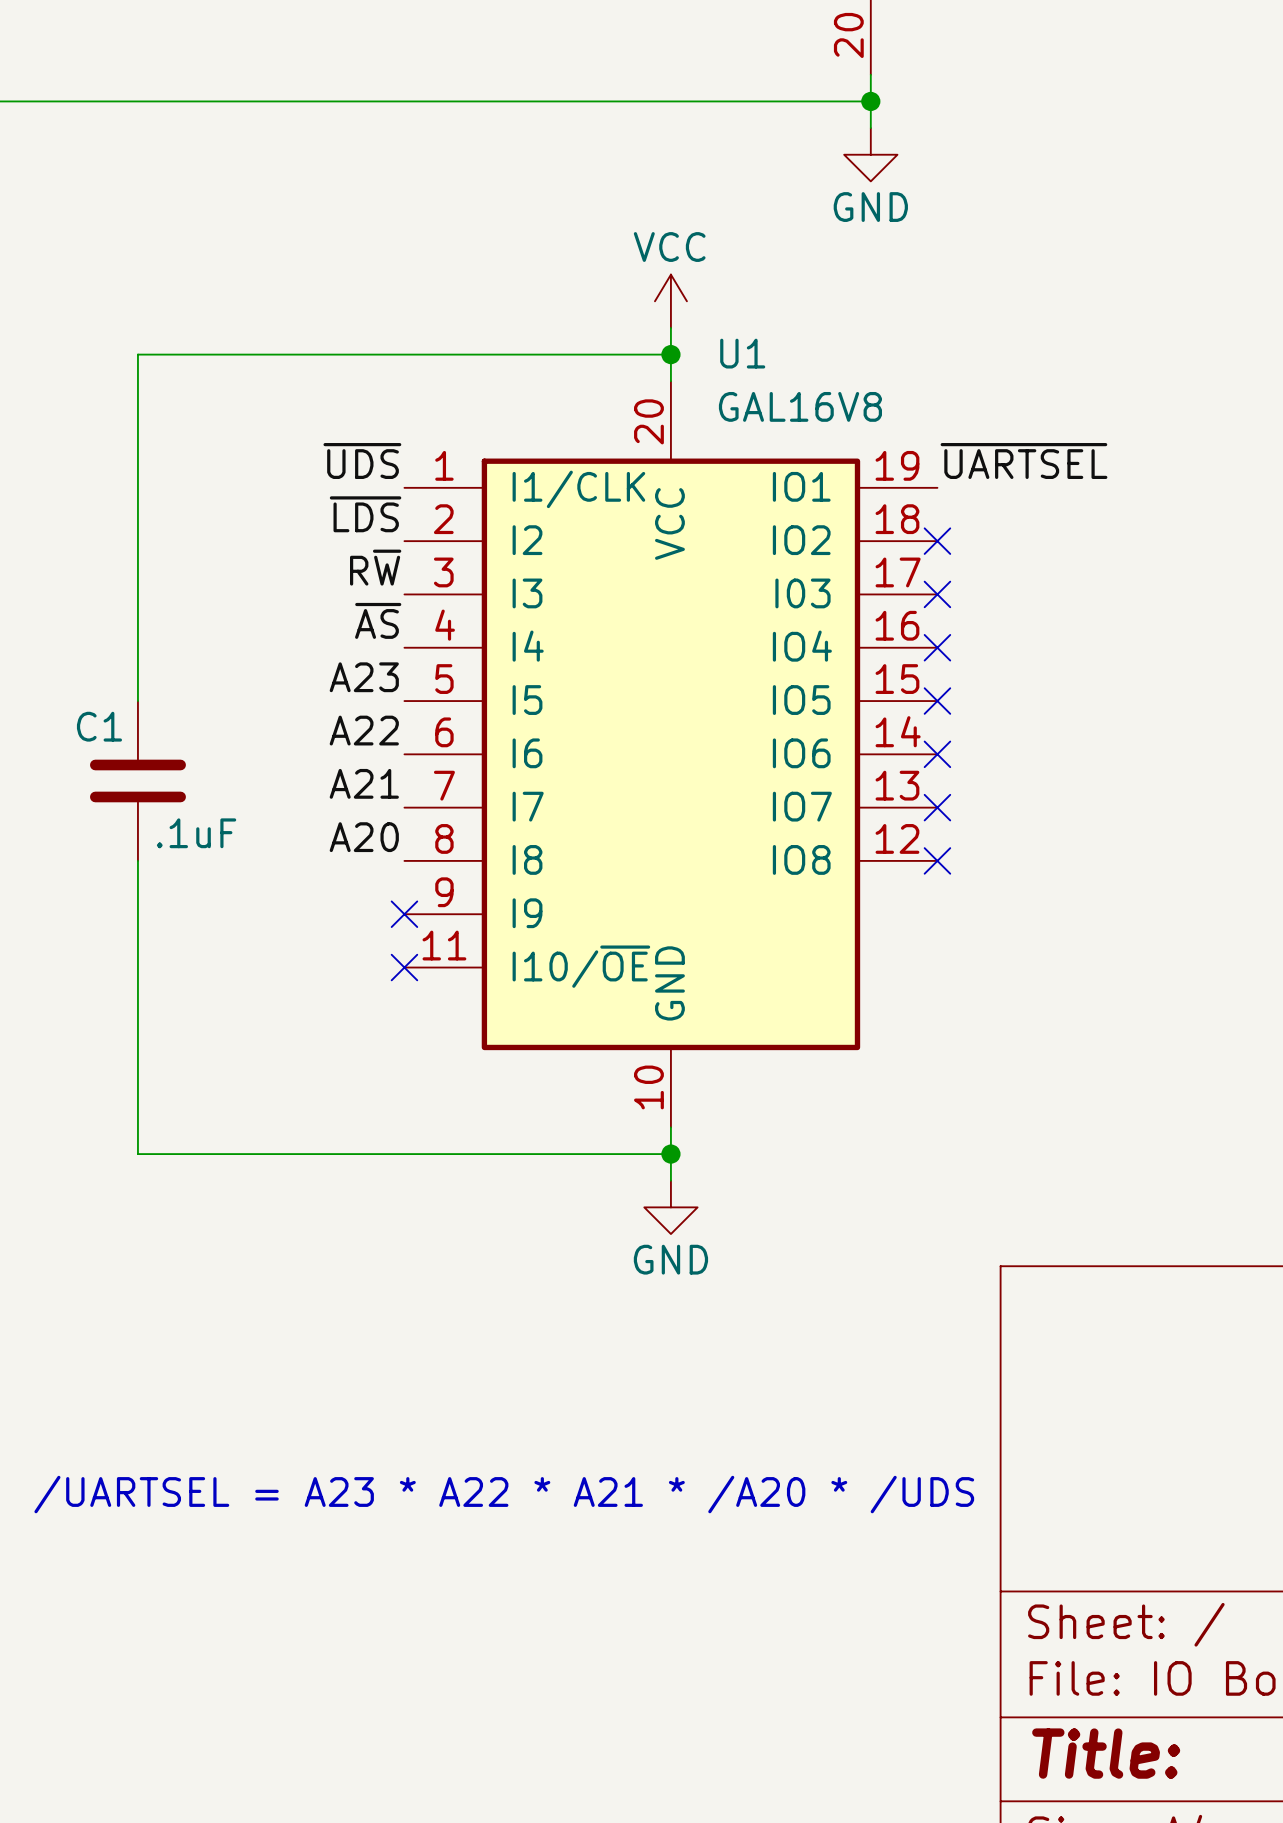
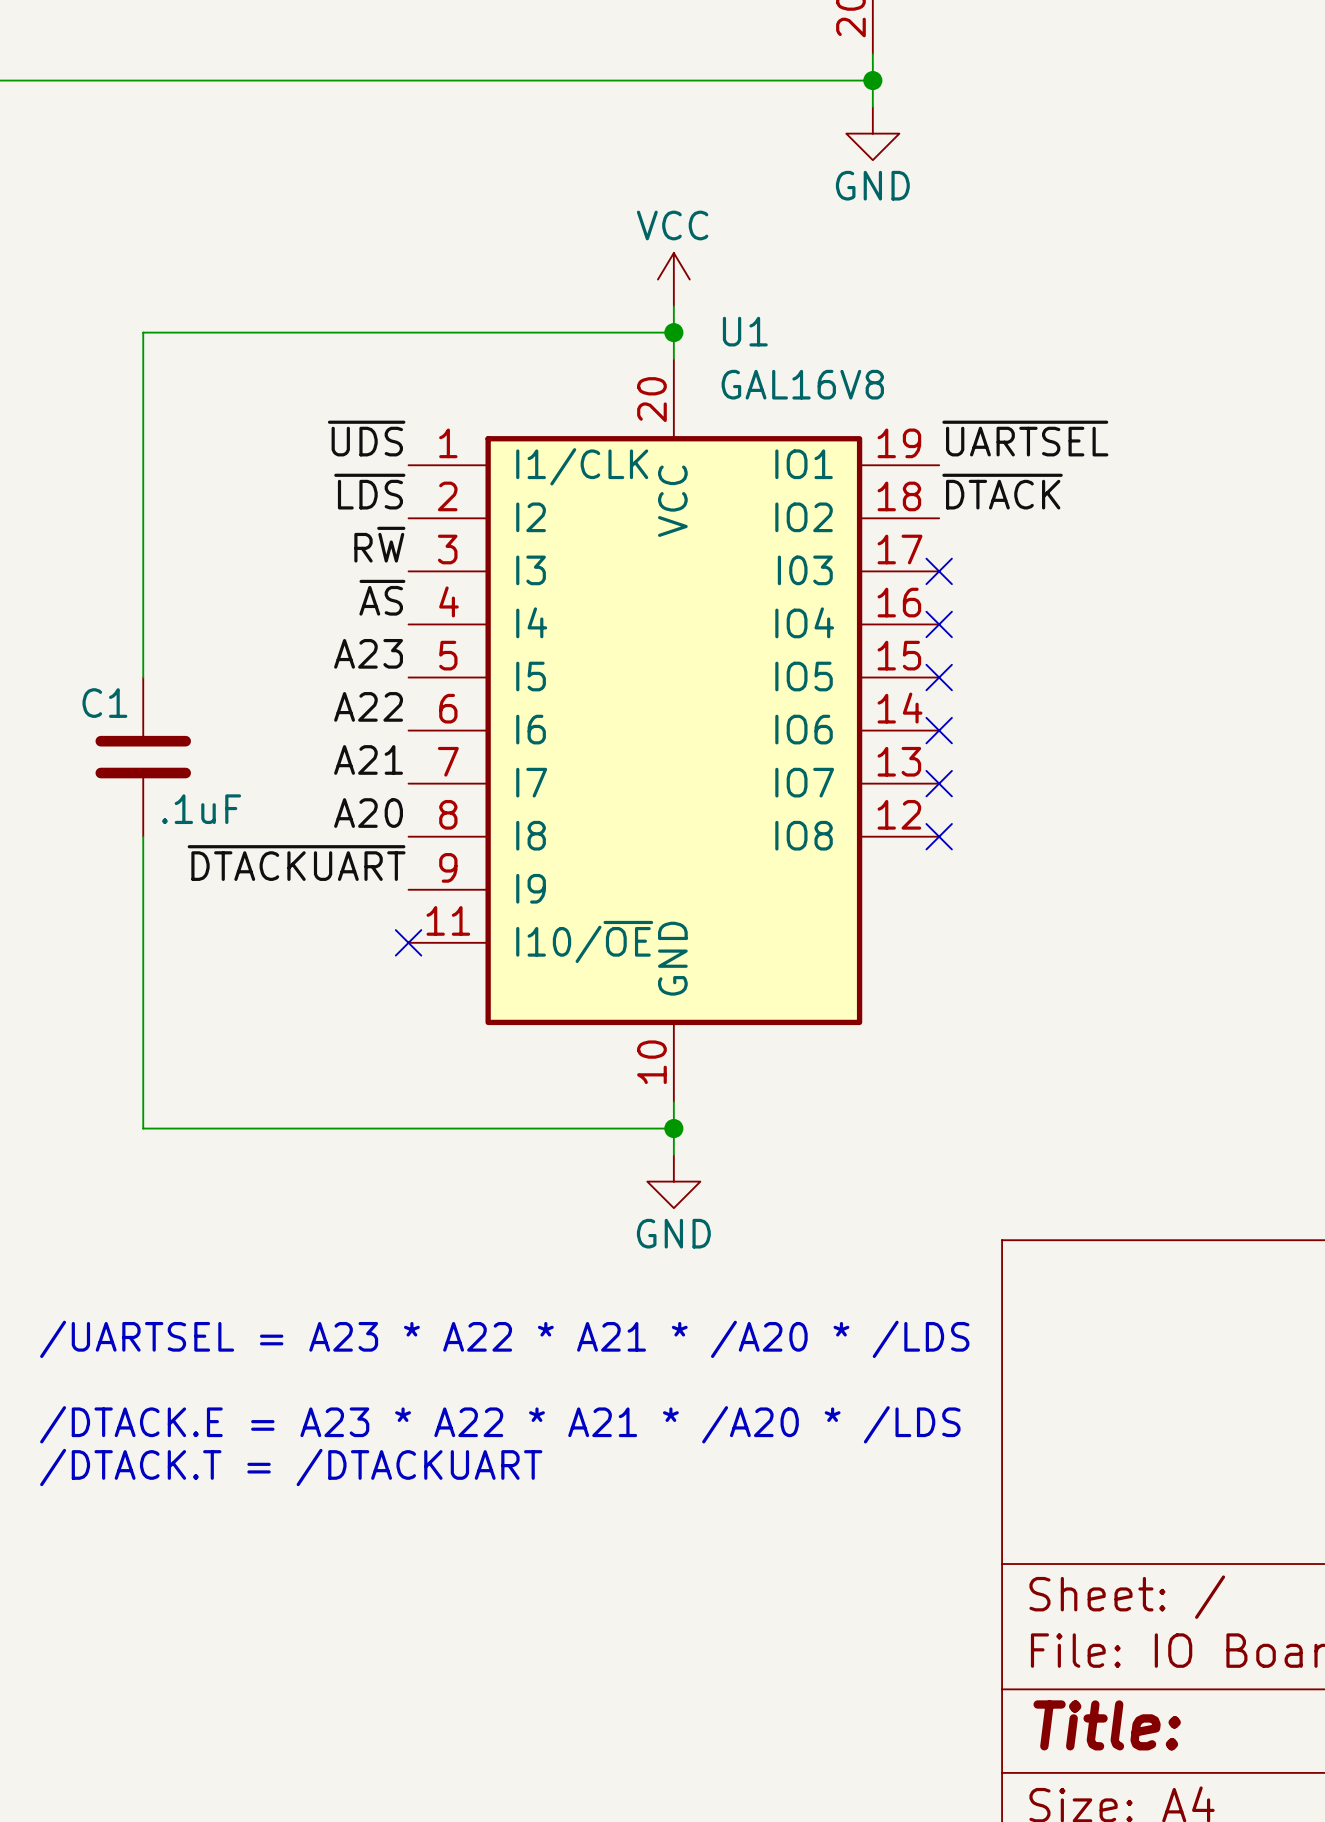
label: none -> ~{DTACK} (1002, 491)
no-connect mark: (937, 541) -> none
label: none -> ~{DTACKUART} (296, 863)
no-connect mark: (404, 914) -> none
text: none -> /UARTSEL = A23 * A22 * A21 * /A20 * /LDS (504, 1339)
text: none -> /DTACK.E = A23 * A22 * A21 * /A20 * /LDS (500, 1424)
text: /UARTSEL = A23 * A22 * A21 * /A20 * /UDS (504, 1494) -> /DTACK.T = /DTACKUART (291, 1467)

